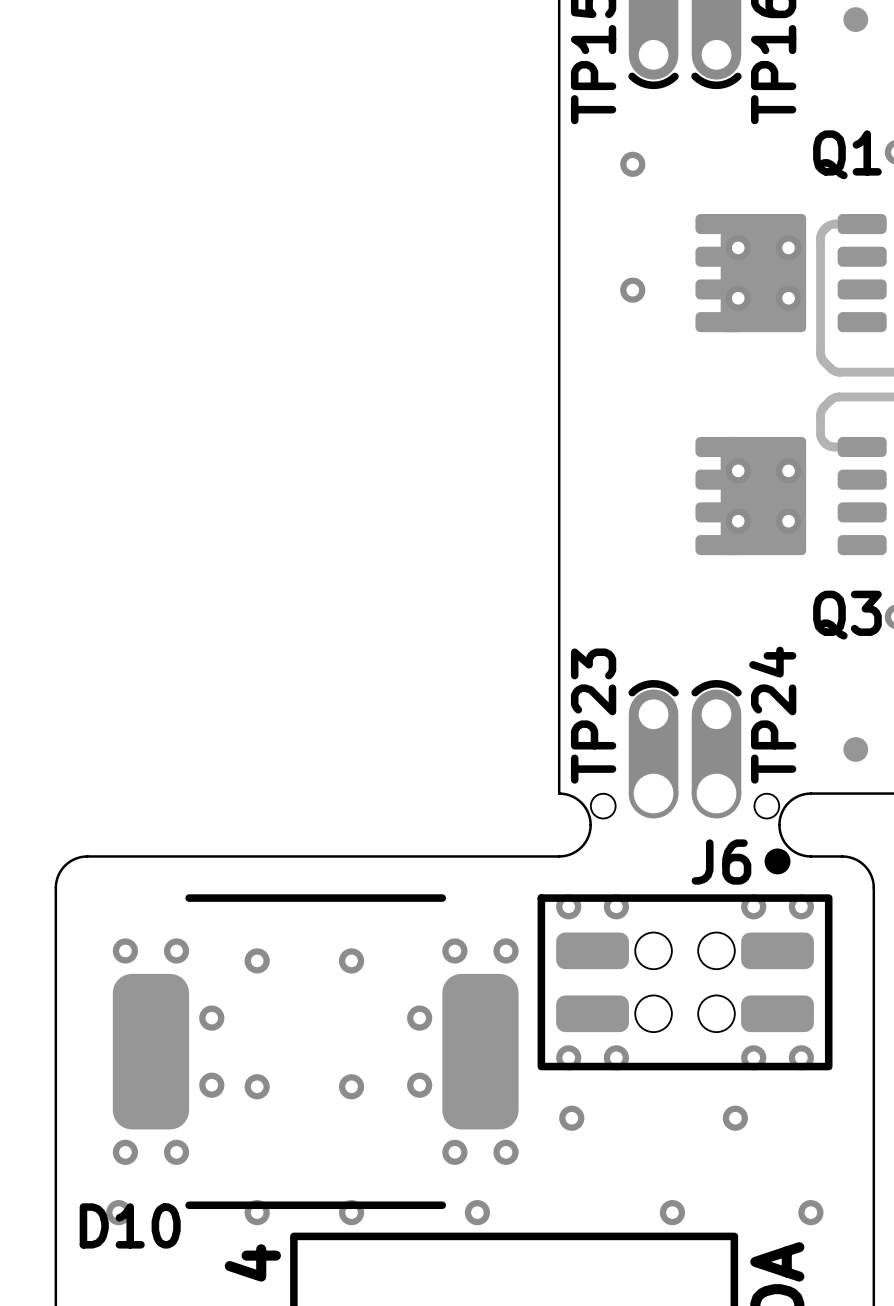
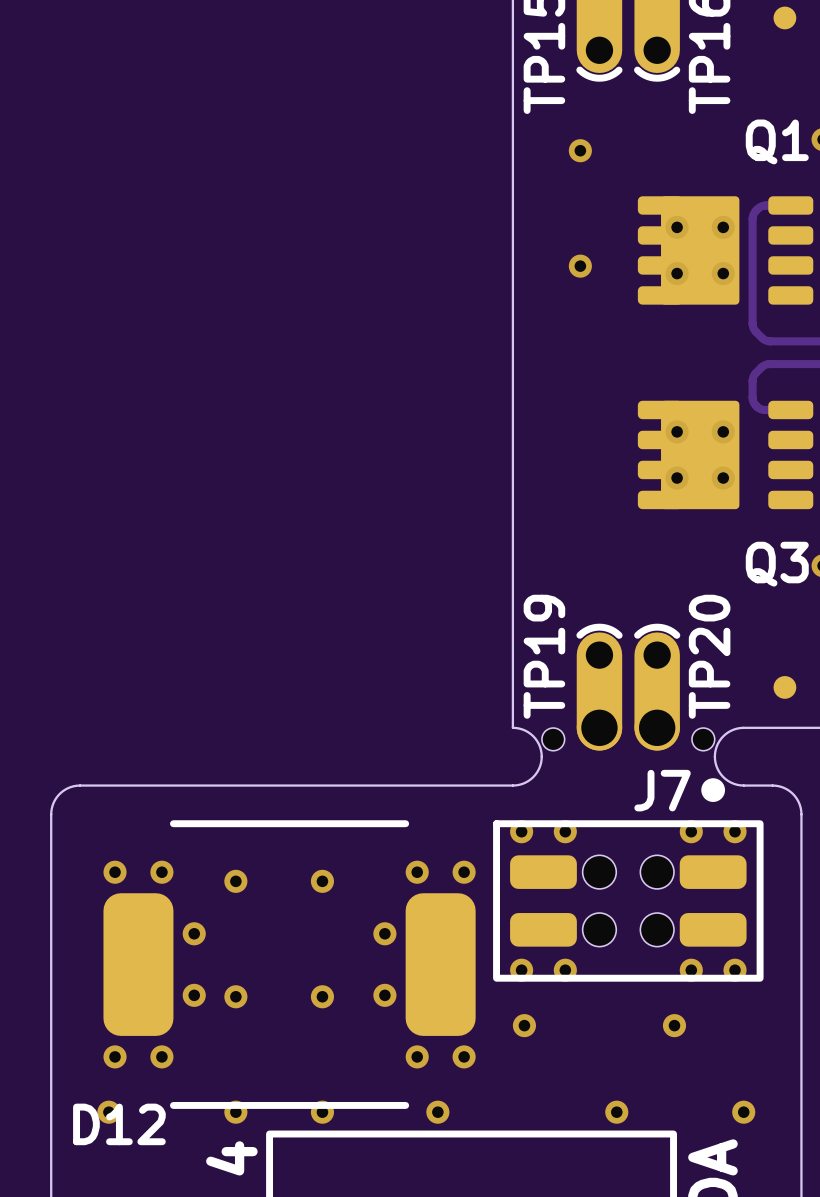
TP24 name: TP24 (772, 715) -> TP20 (709, 656)
TP23 name: TP23 (593, 716) -> TP19 (544, 656)
J6 name: J6 (721, 862) -> J7 (662, 790)
D10 name: D10 (130, 1225) -> D12 (119, 1124)

